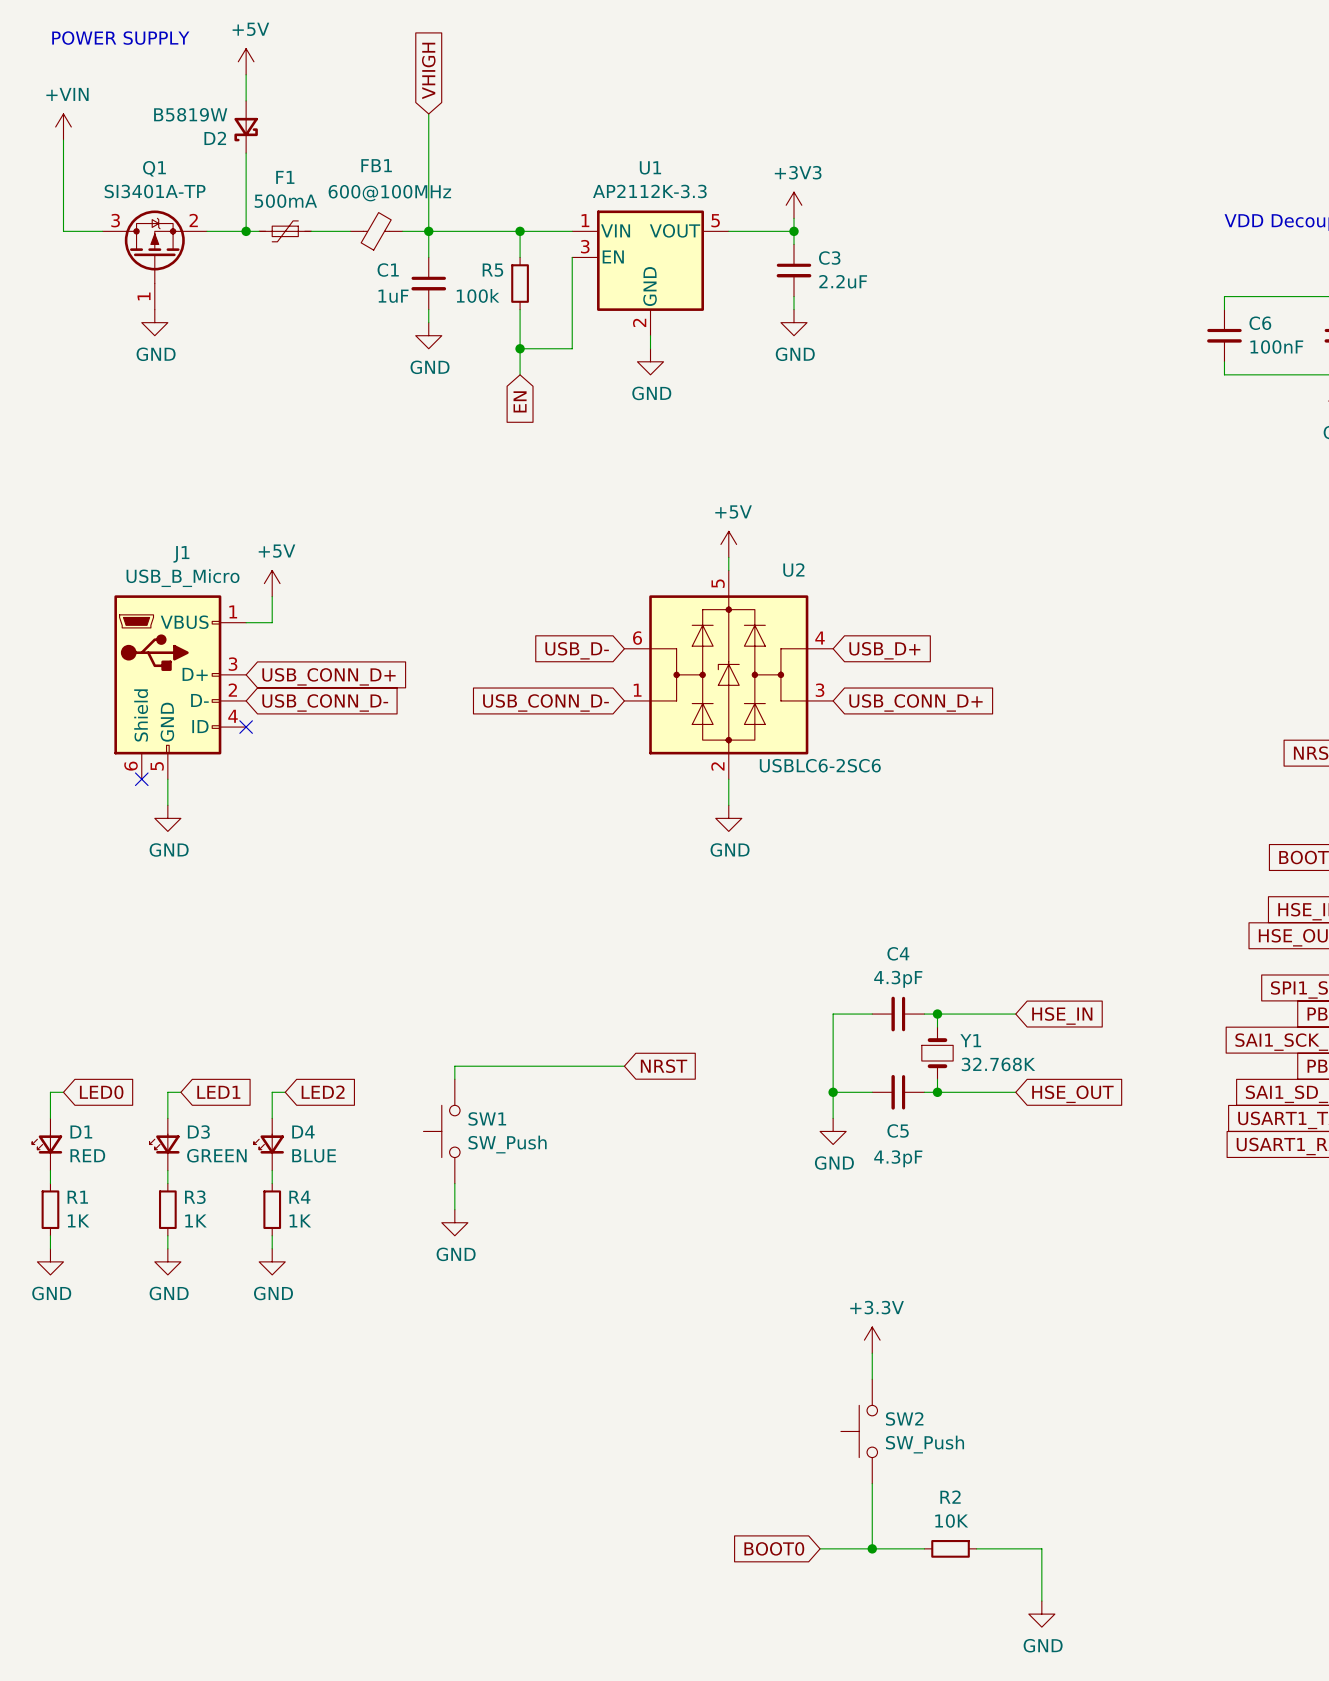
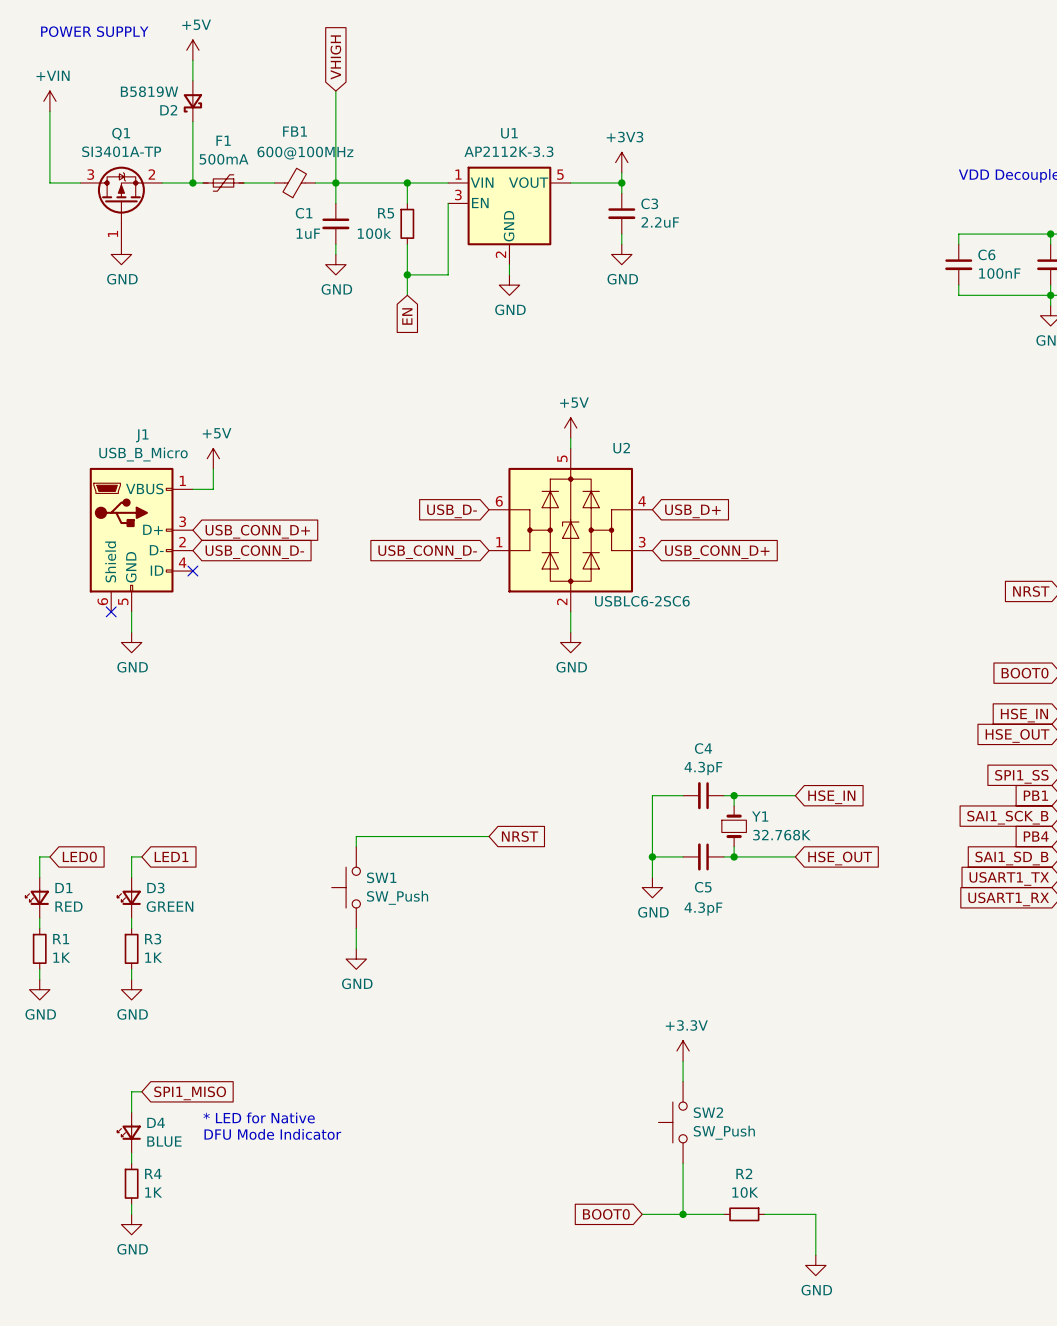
wire: (285, 1092) (272, 1092) (272, 1118) -> none
global label: LED2 (323, 1092) -> none
D4 position: (268, 1144) -> (129, 1132)
wire: (272, 1170) (272, 1183) -> none
R4 position: (272, 1209) -> (131, 1183)
wire: (272, 1235) (272, 1248) -> none
power symbol: GND (272, 1261) -> none
wire: none -> (141, 1091) (131, 1091) (131, 1112)
global label: none -> SPI1_MISO (190, 1093)
text: none -> * LED for Native (259, 1117)
text: none -> DFU Mode Indicator (272, 1134)
wire: none -> (131, 1153) (131, 1163)
wire: none -> (131, 1204) (131, 1214)
power symbol: none -> GND (131, 1224)

